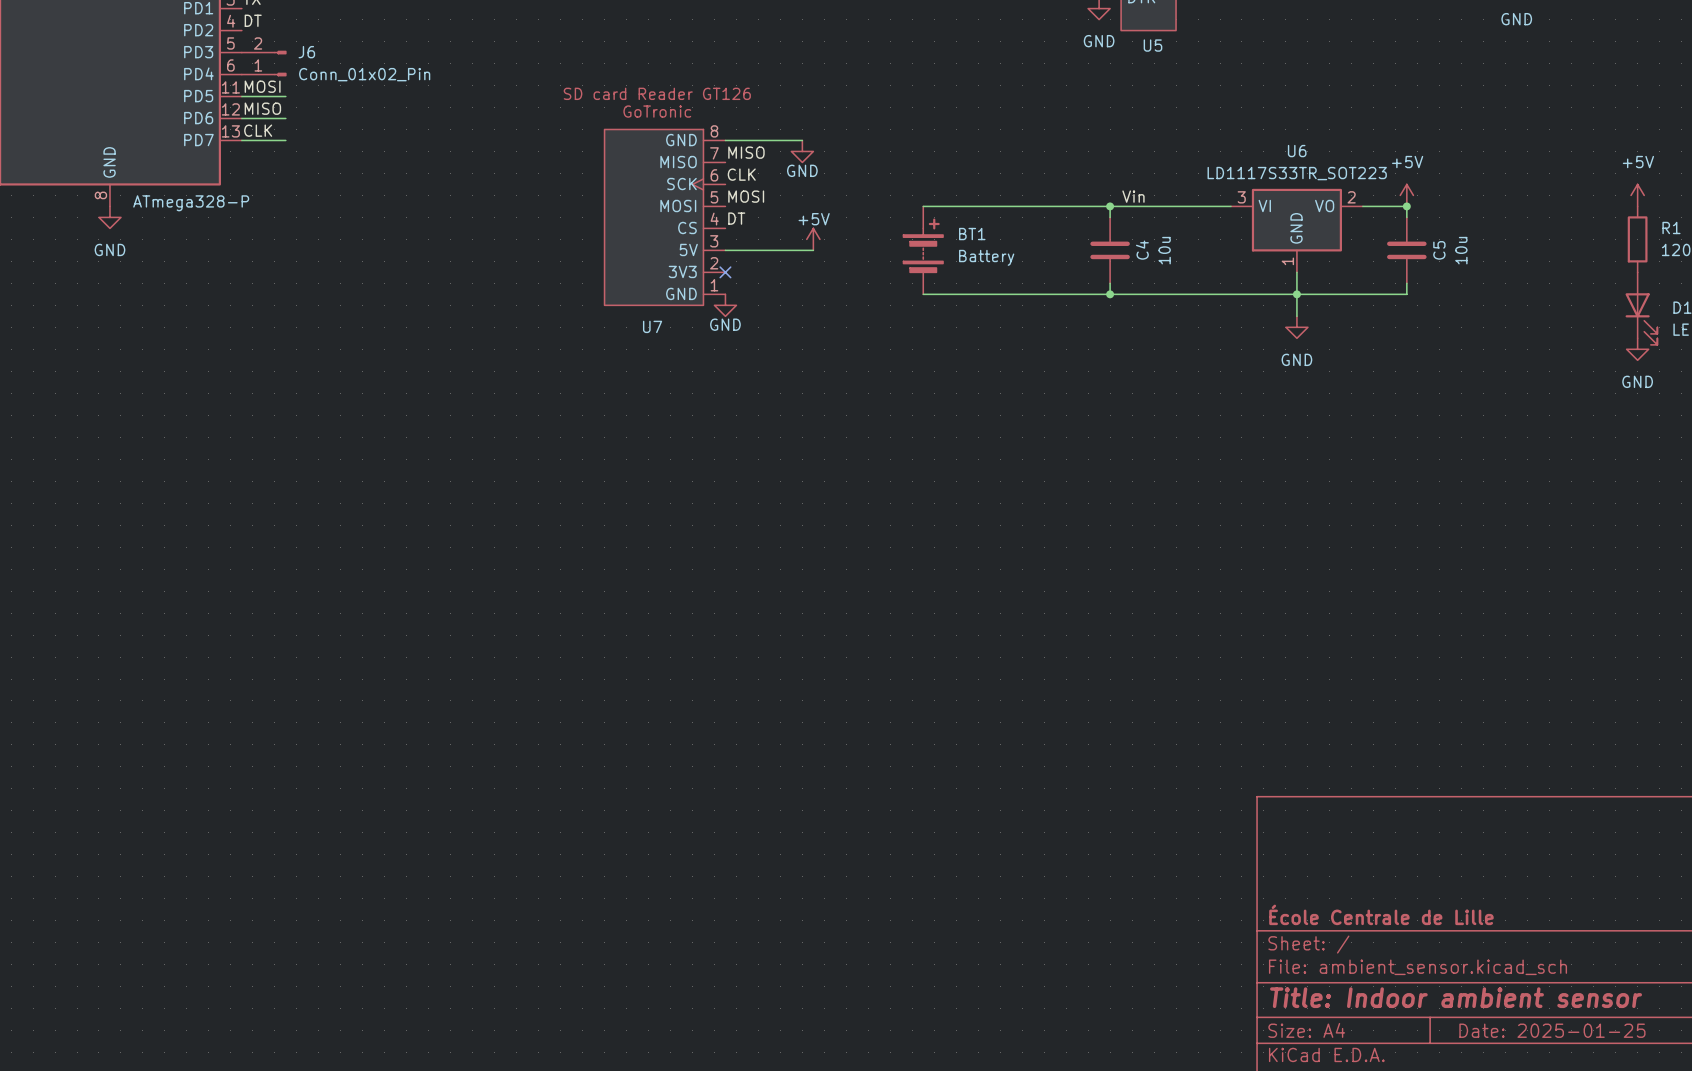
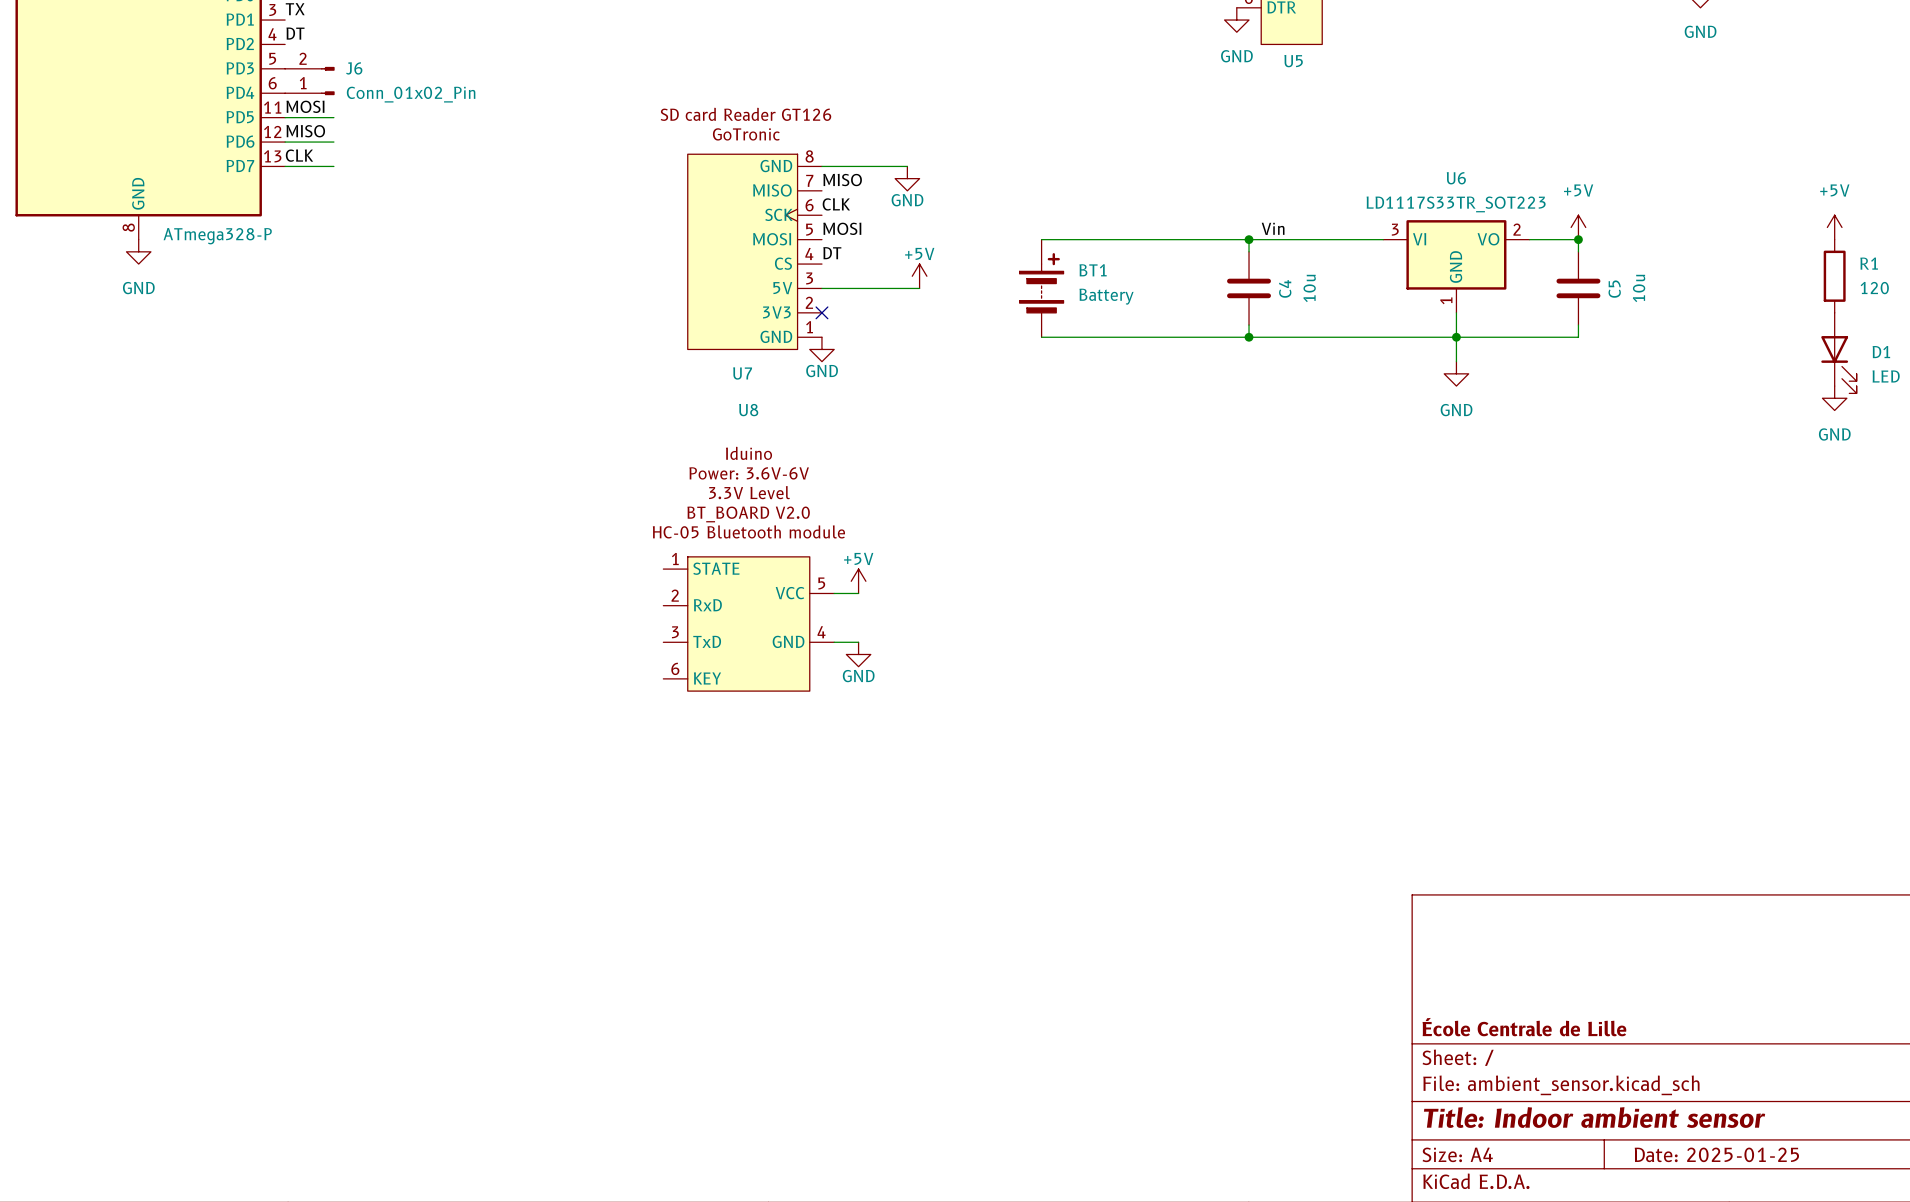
power symbol: none -> +5V (858, 581)
wire: none -> (834, 593) (858, 593)
U8: none -> (748, 623)
wire: none -> (834, 642) (858, 642)
power symbol: none -> GND (858, 654)

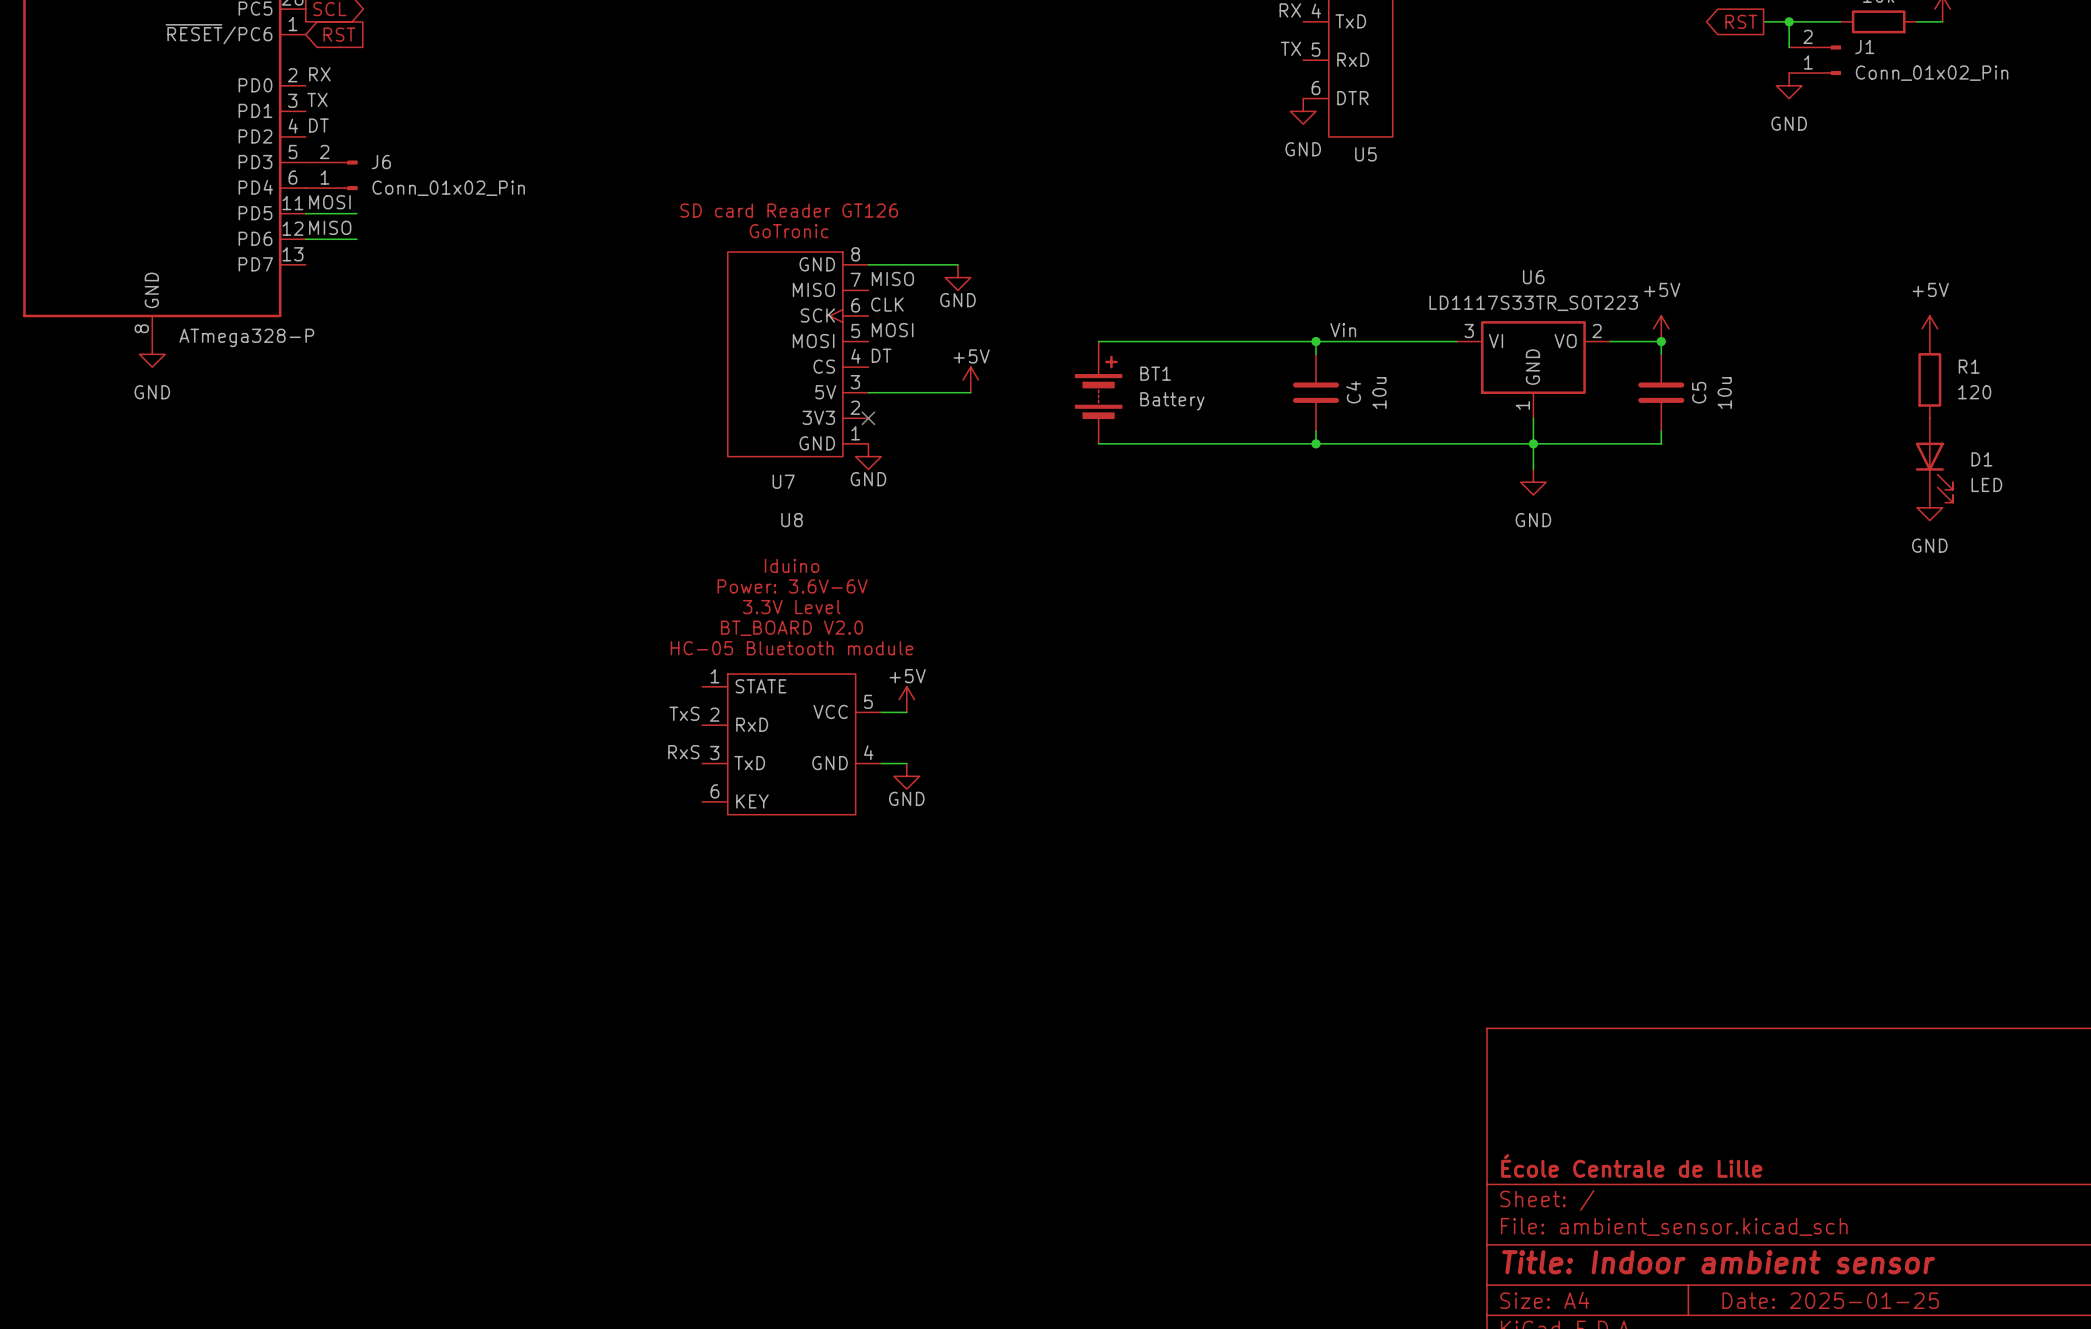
label: CLK (299, 155) -> none
wire: (285, 166) (333, 166) -> none
label: none -> TxS (684, 713)
label: none -> RxS (683, 752)

